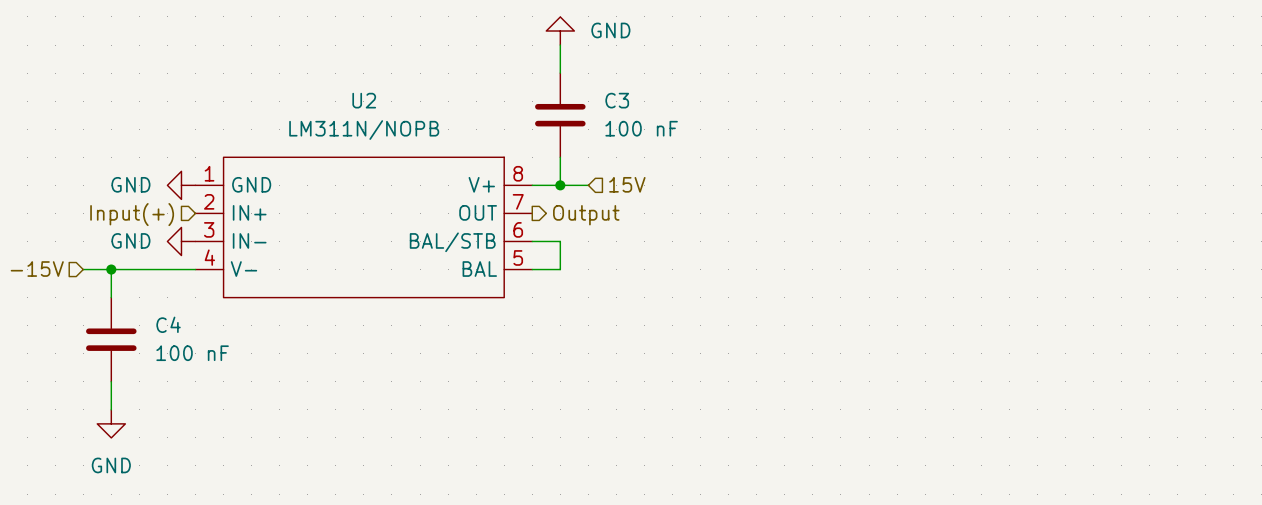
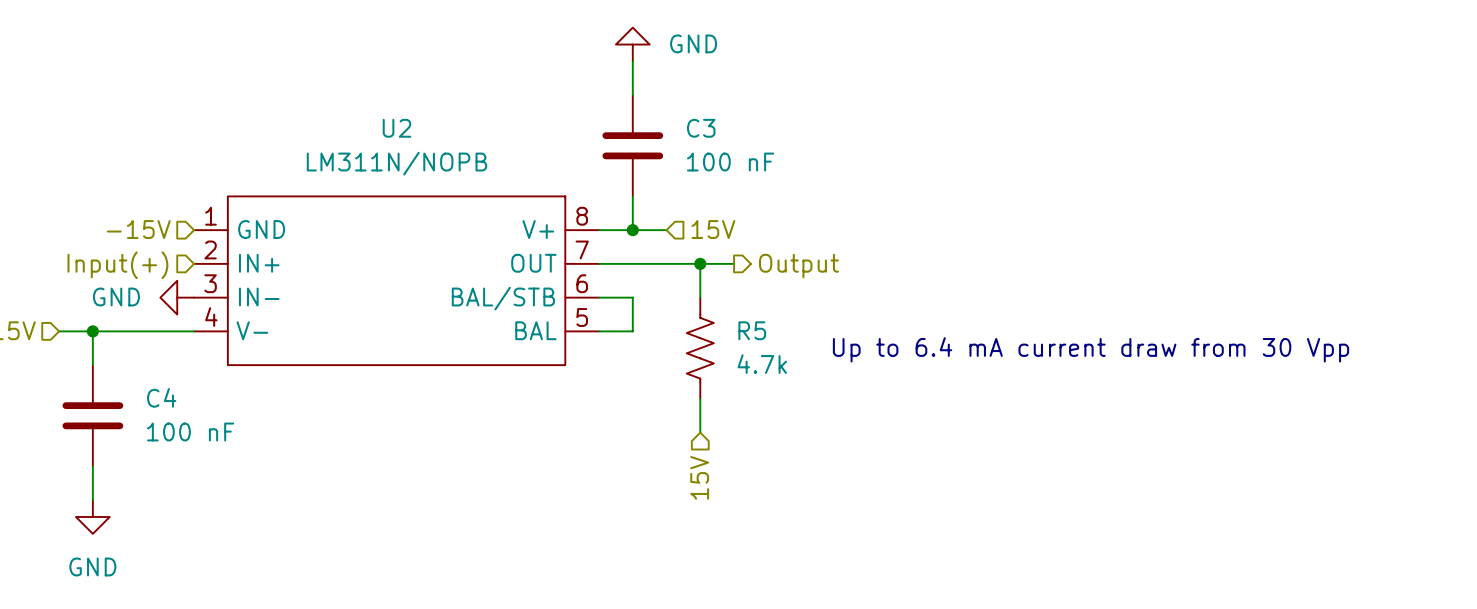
hierarchical label: none -> -15V (138, 229)
power symbol: GND (181, 185) -> none
wire: none -> (599, 263) (734, 263)
wire: none -> (700, 263) (700, 297)
junction: none -> (700, 263)
hierarchical label position: Output (586, 215) -> Output (798, 266)
R5: none -> 4.7k (700, 348)
text: none -> Up to 6.4 mA current draw from 30 Vpp (1091, 349)
wire: none -> (700, 398) (700, 432)
hierarchical label: none -> 15V (699, 477)

